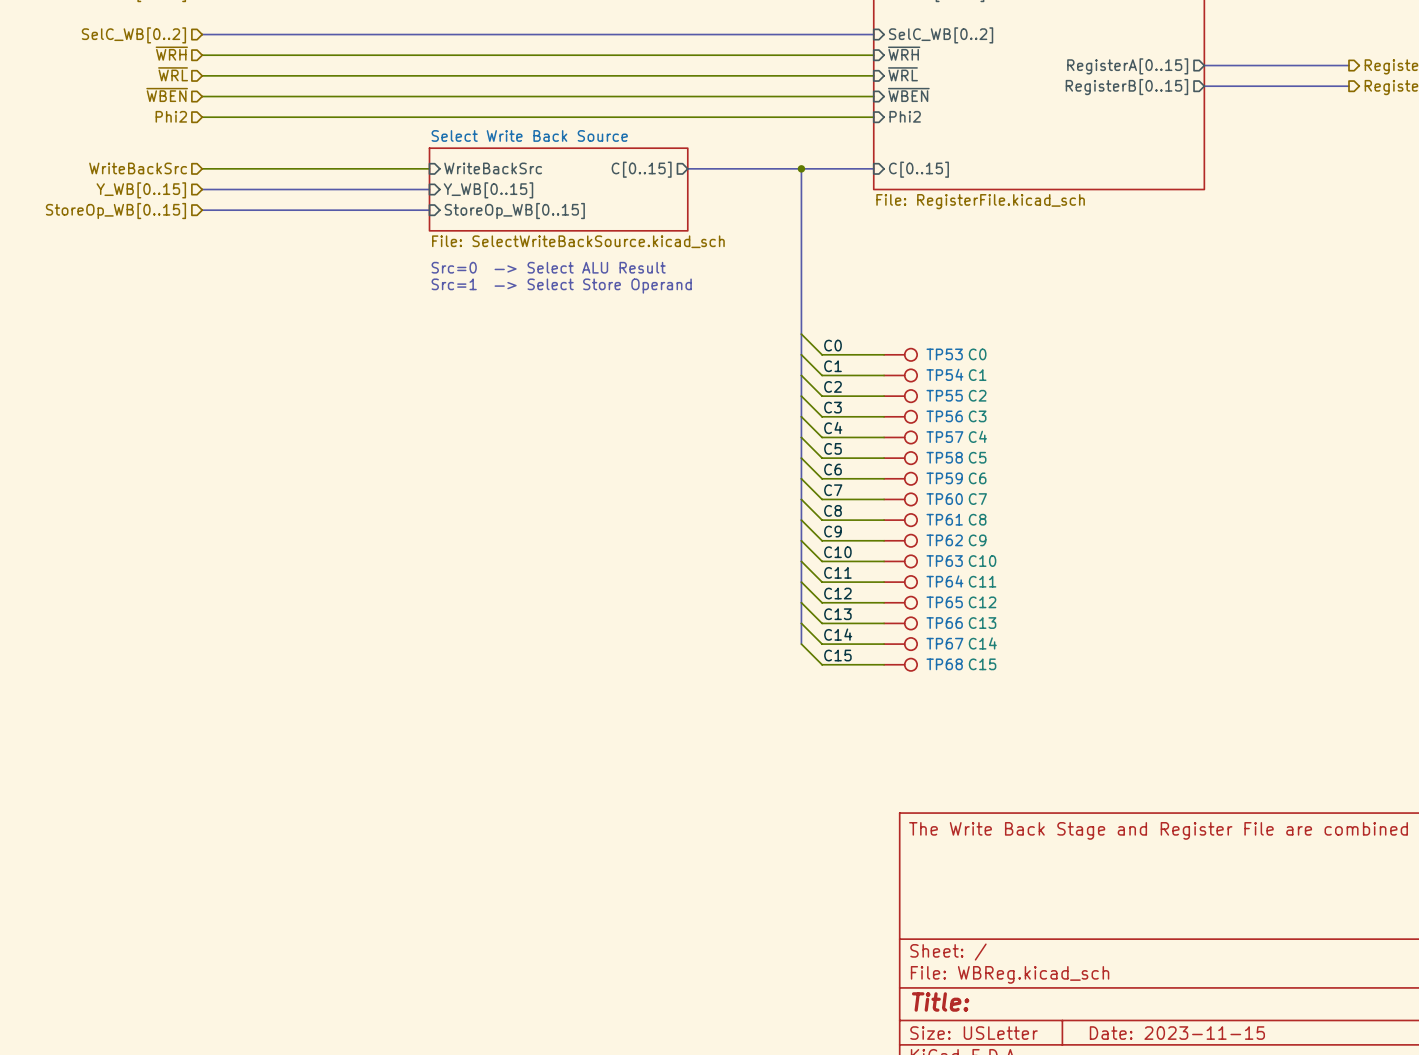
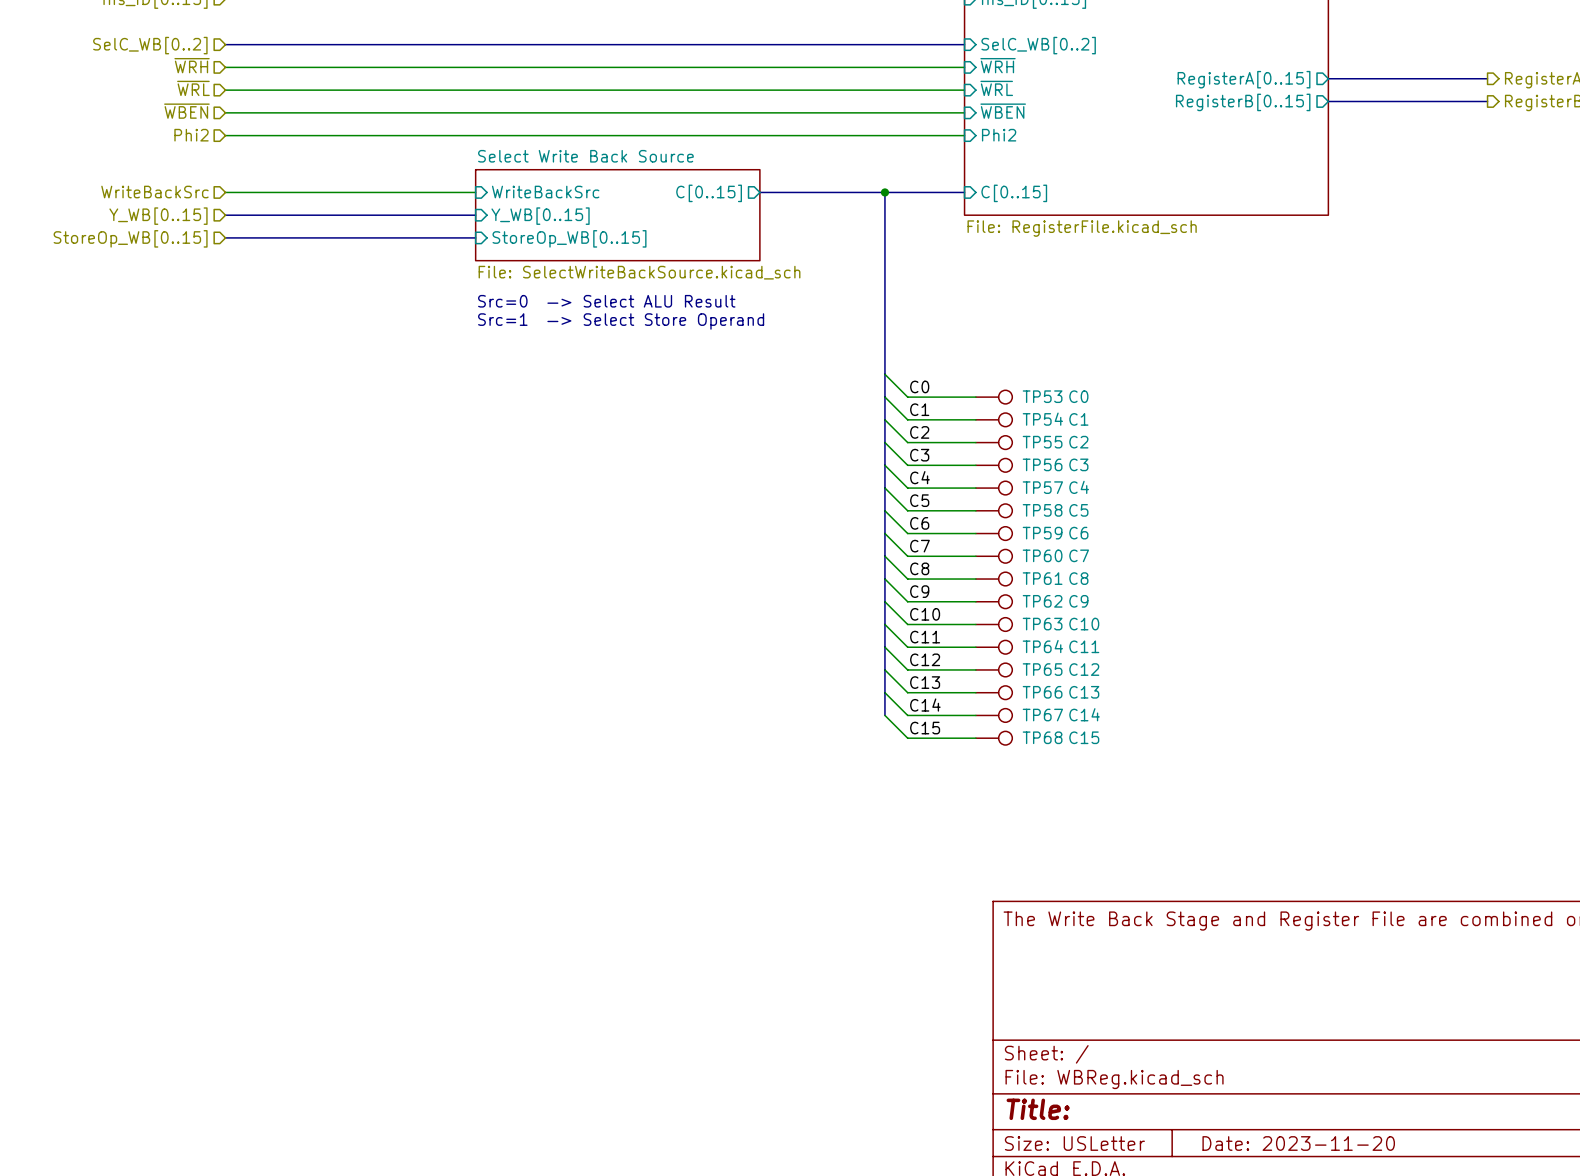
title block: Date: 2023-11-15 (1177, 1033) -> Date: 2023-11-20 (1298, 1143)

